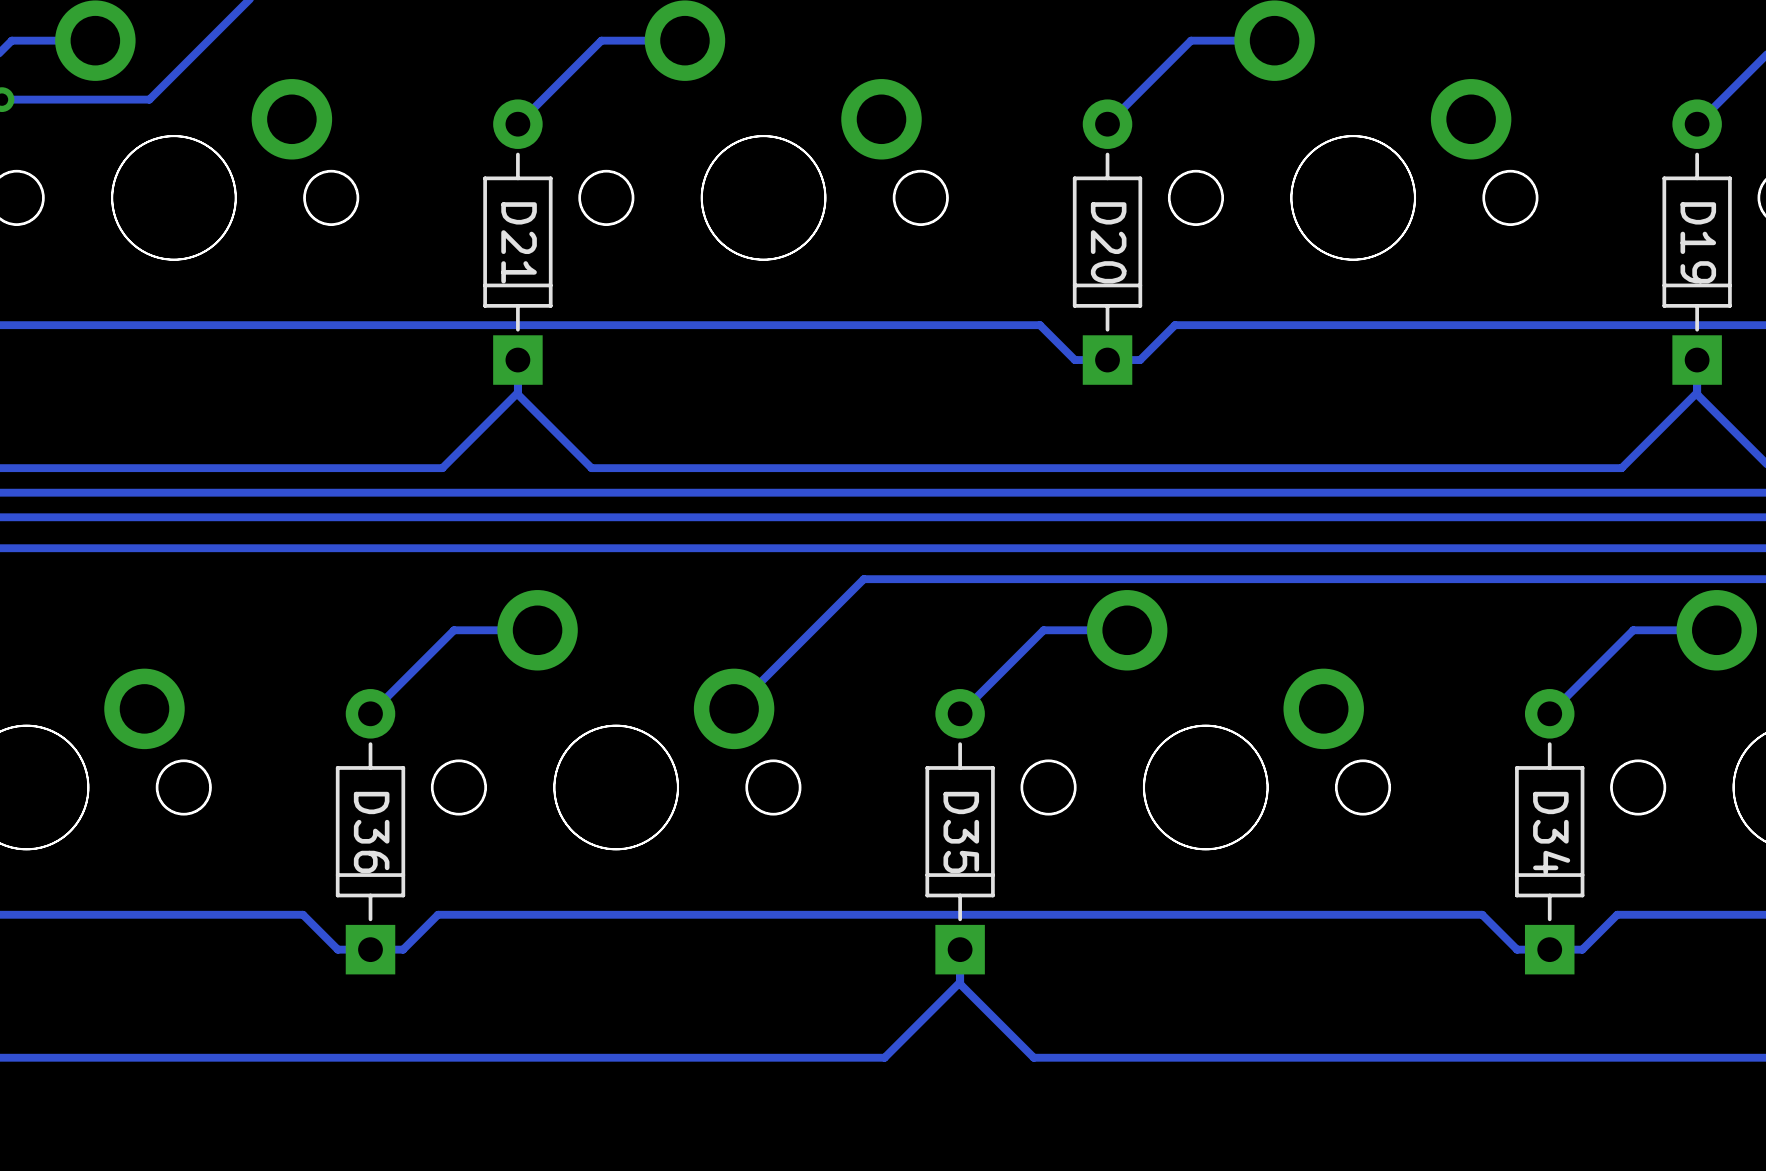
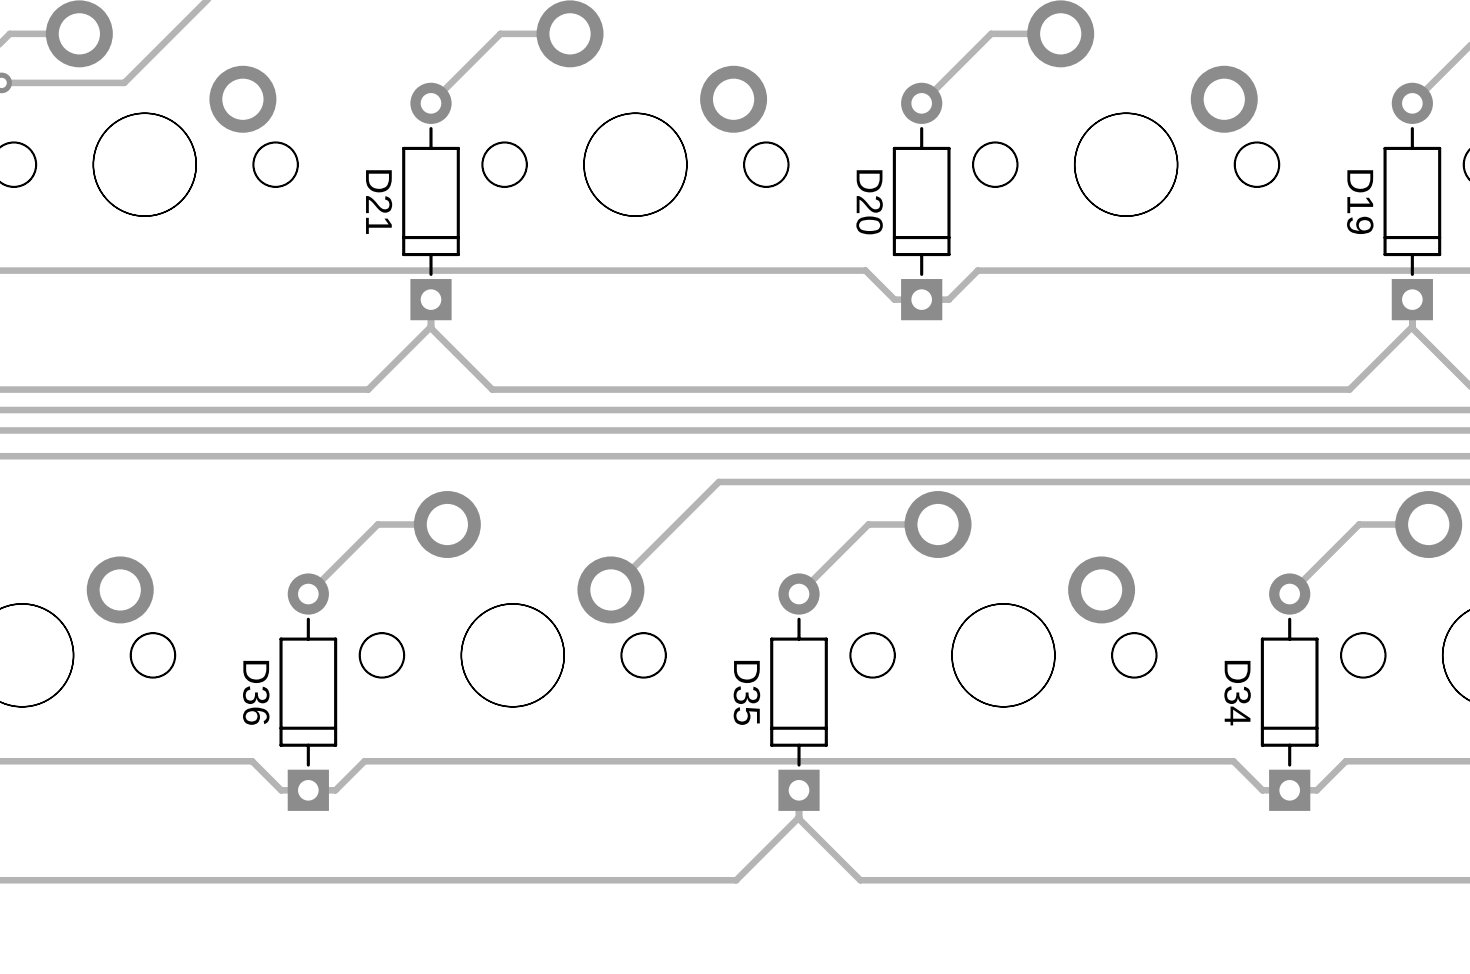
D21 name position: D21 (519, 242) -> D21 (379, 202)
D20 name position: D20 (1108, 242) -> D20 (869, 202)
D19 name position: D19 (1698, 242) -> D19 (1360, 202)
D36 name position: D36 (371, 832) -> D36 (256, 692)
D35 name position: D35 (961, 832) -> D35 (746, 692)
D34 name position: D34 (1551, 833) -> D34 (1237, 693)

